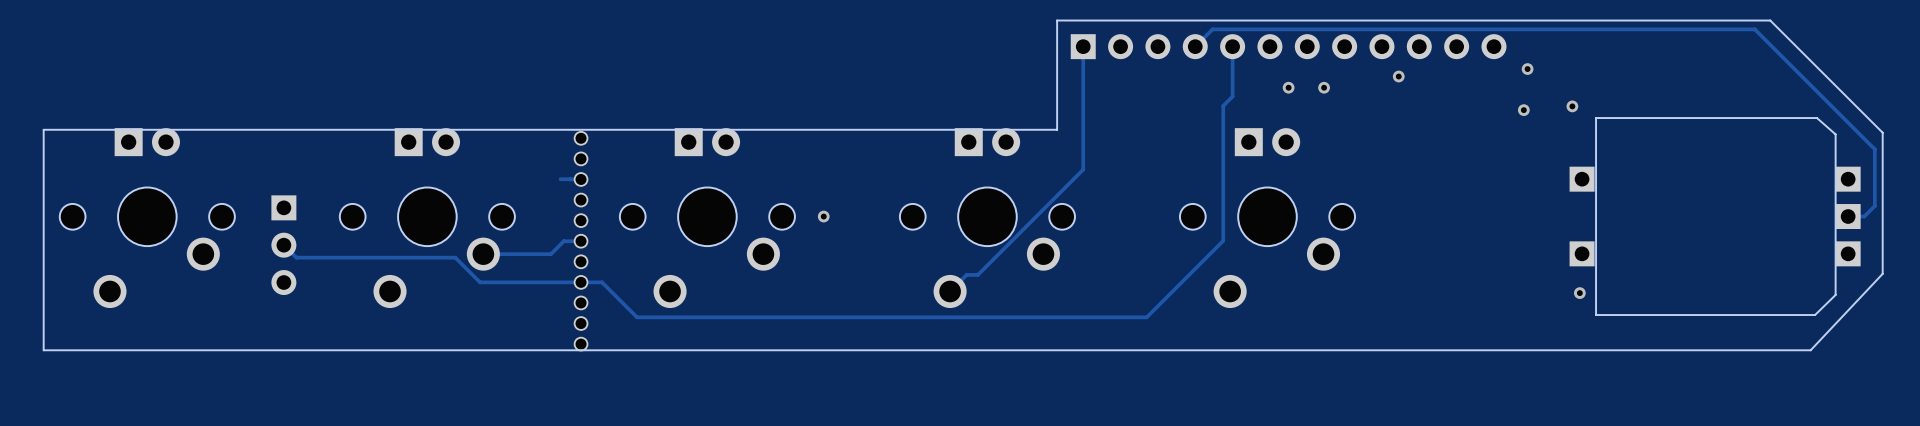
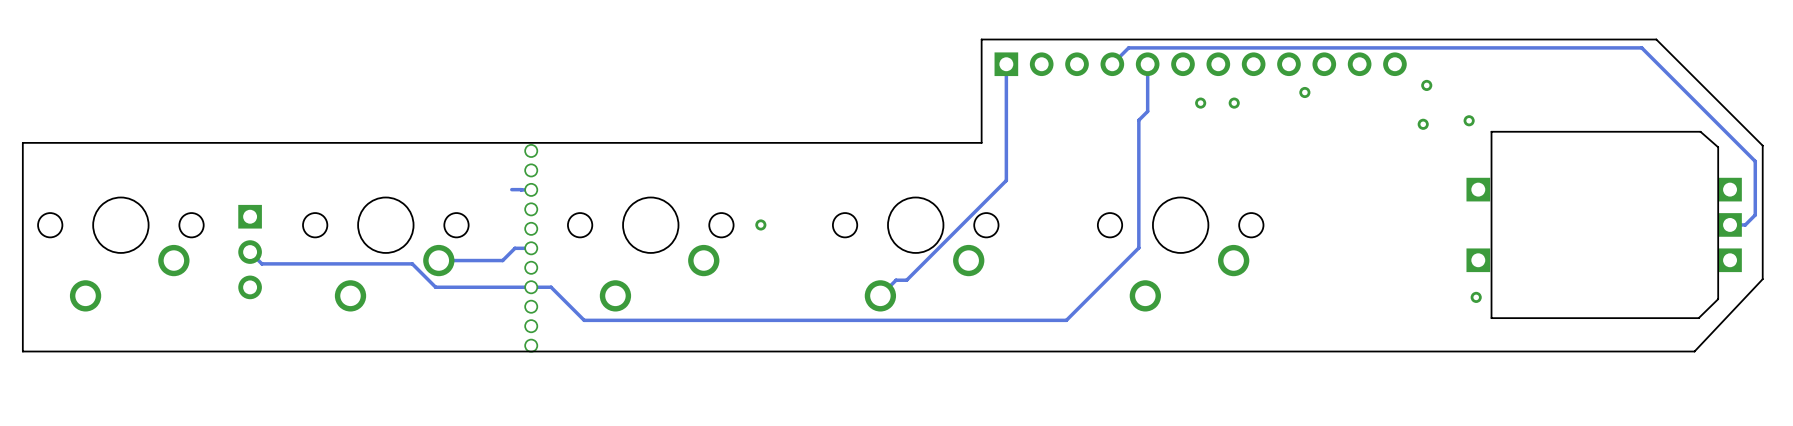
part: (147, 218) -> none
part: (427, 218) -> none
part: (707, 218) -> none
part: (987, 218) -> none
part: (1267, 218) -> none

